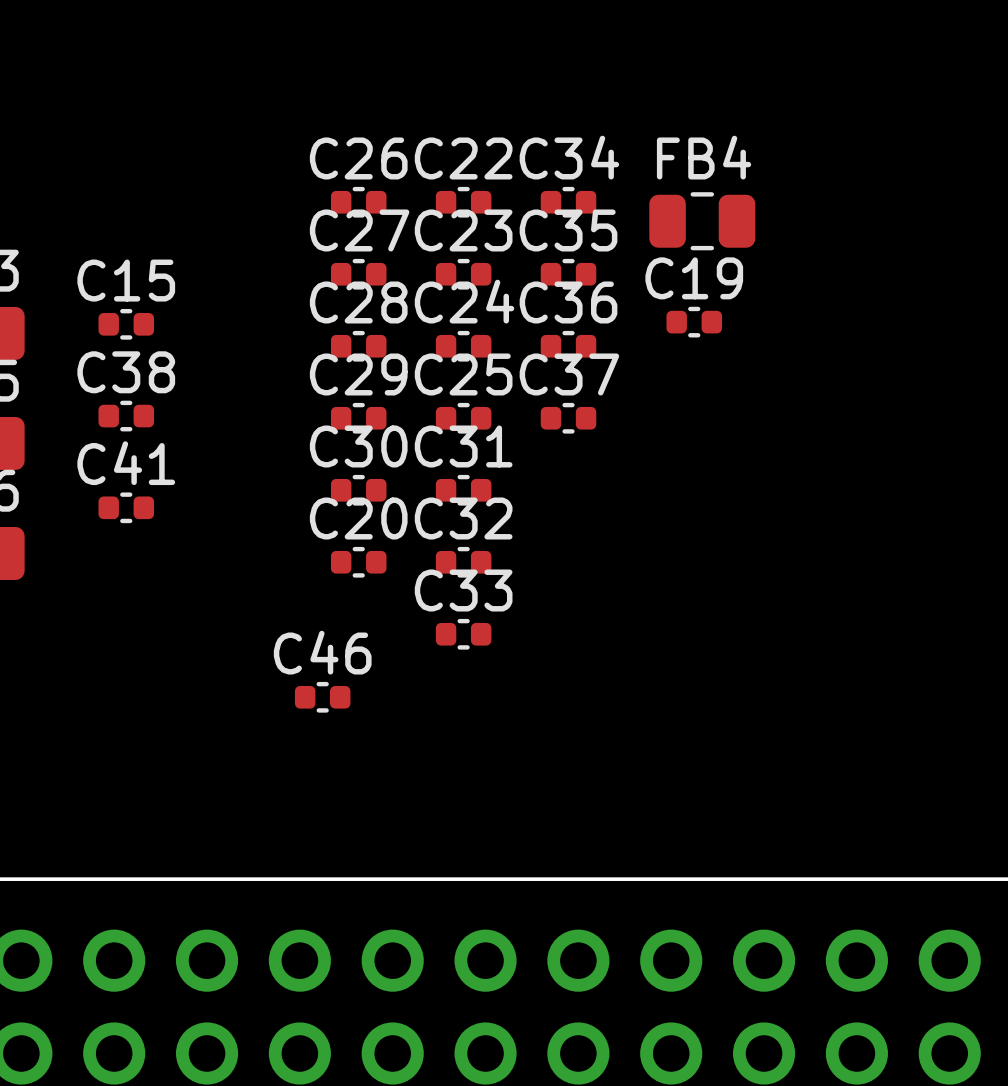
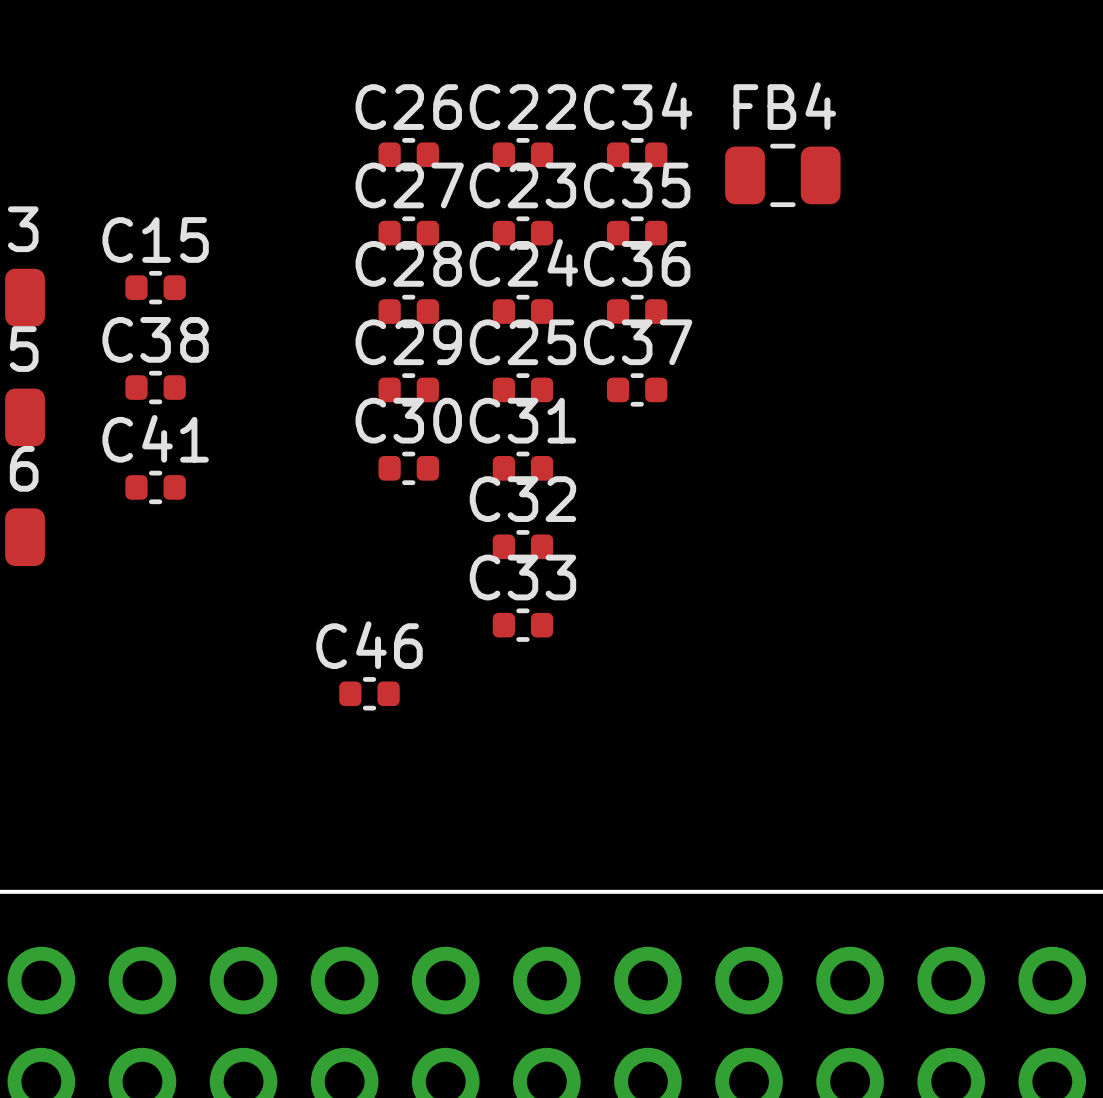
C19: (694, 322) -> none
C20: (358, 562) -> none

